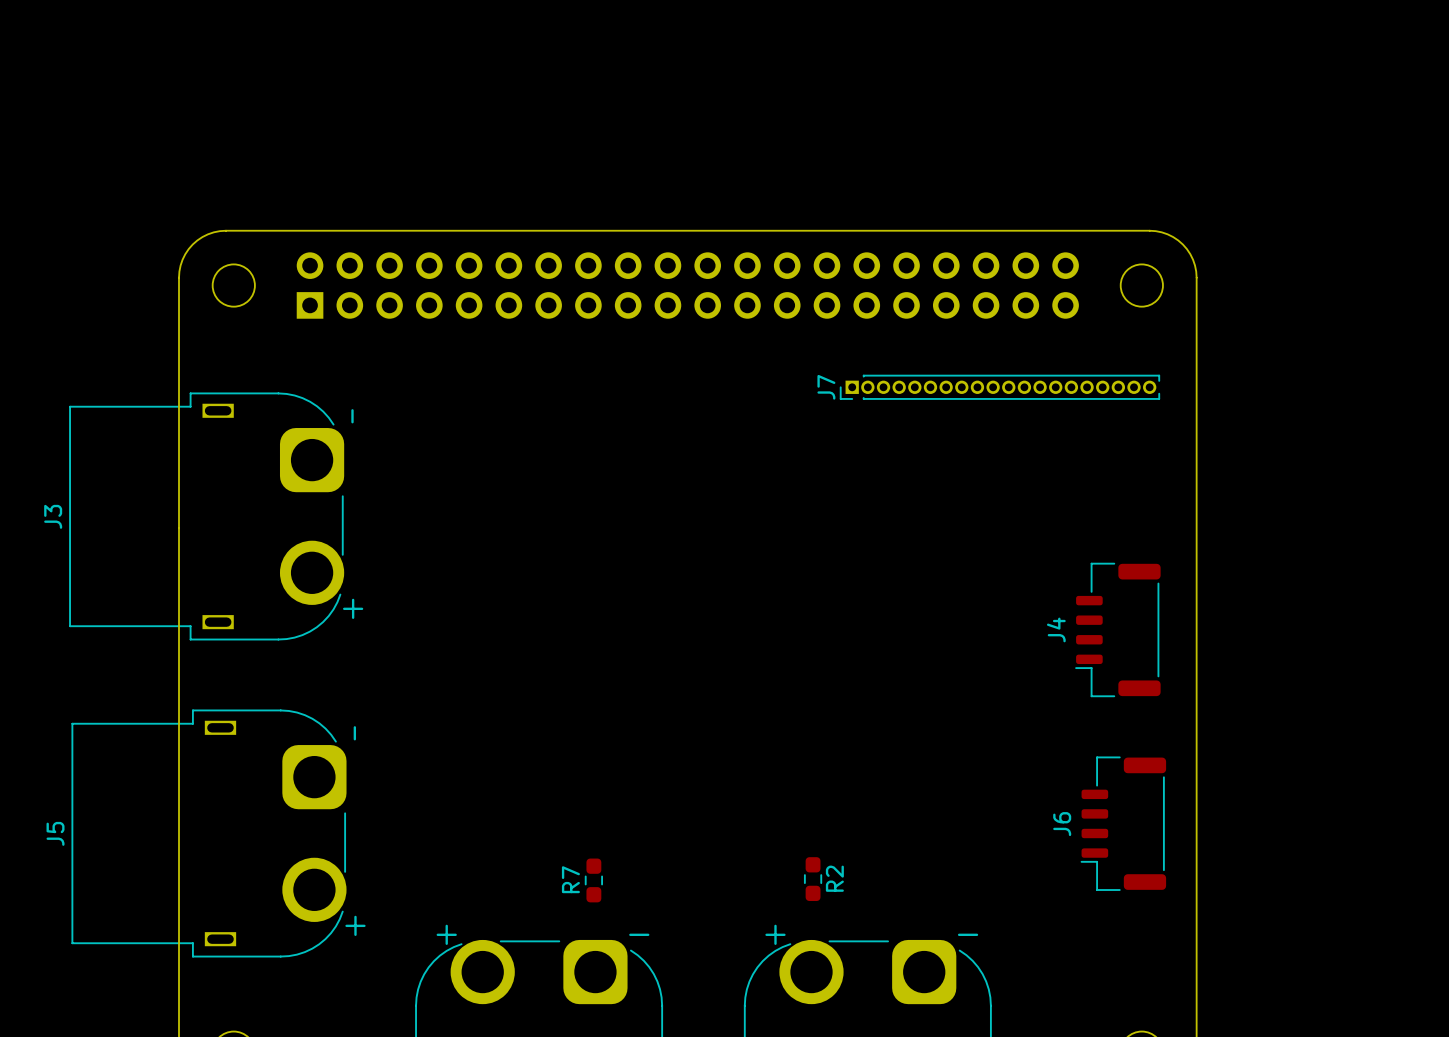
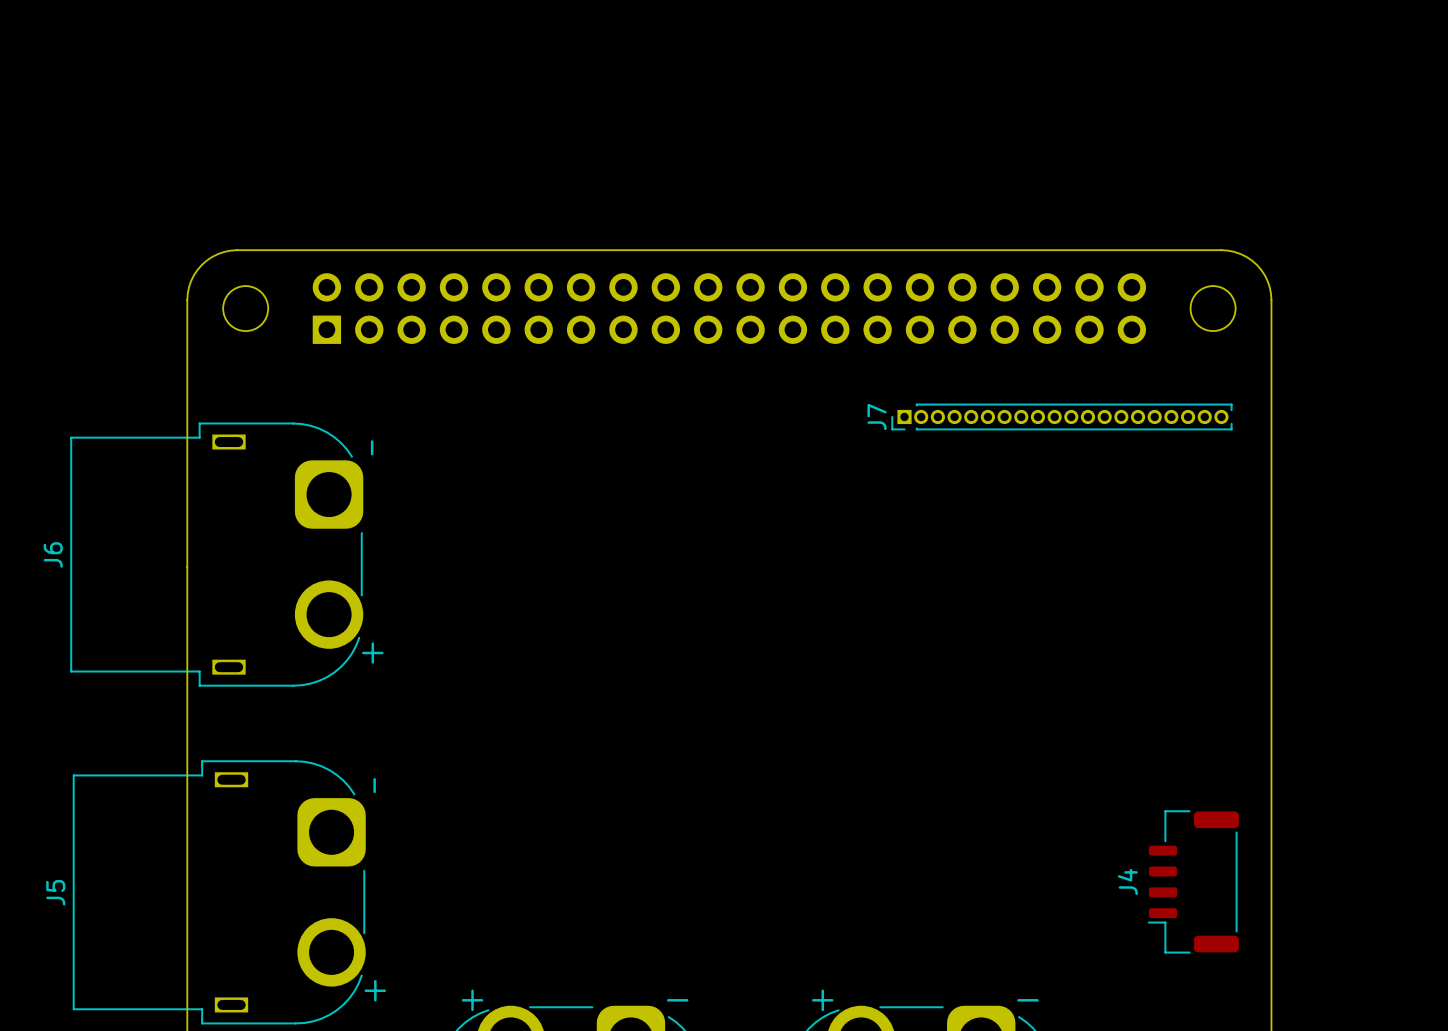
J3 name: J3 (53, 516) -> J6 (53, 554)
J4: (1117, 629) -> none
J6 name: J6 (1062, 824) -> J4 (1127, 881)
R2: (813, 879) -> none
R7: (593, 880) -> none

